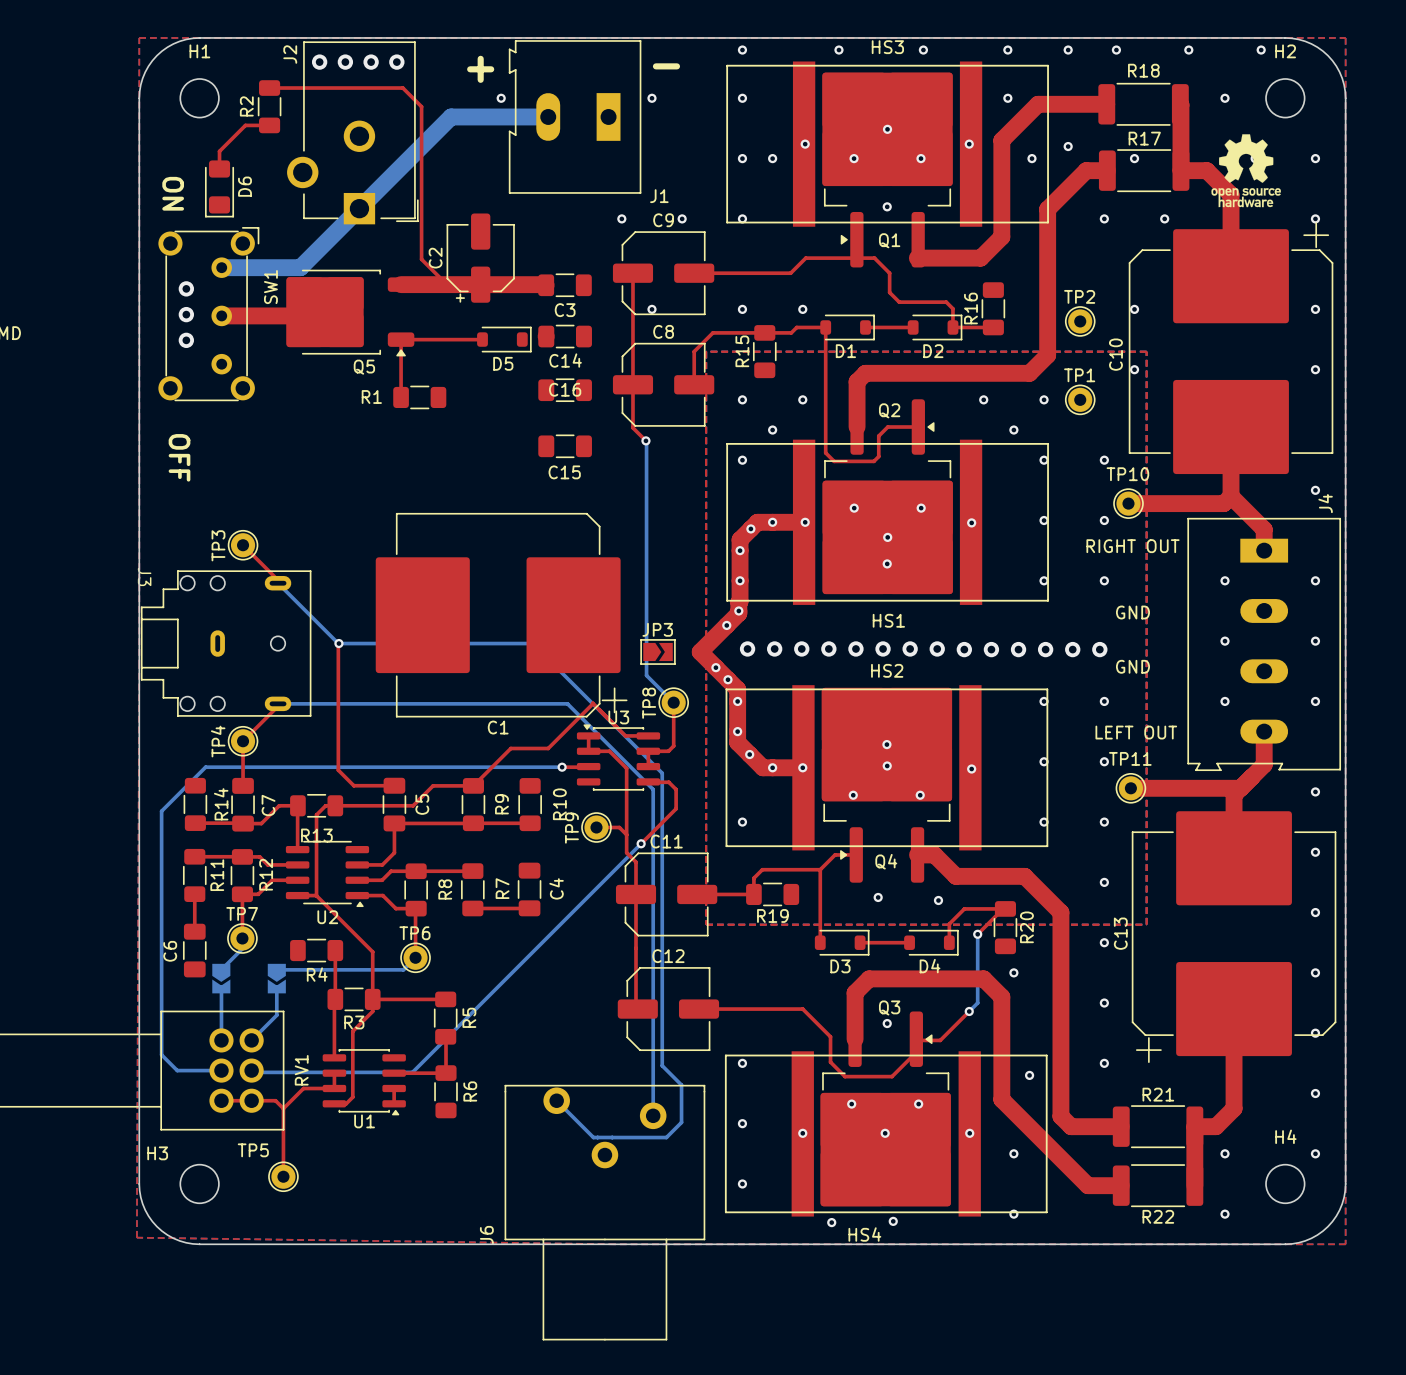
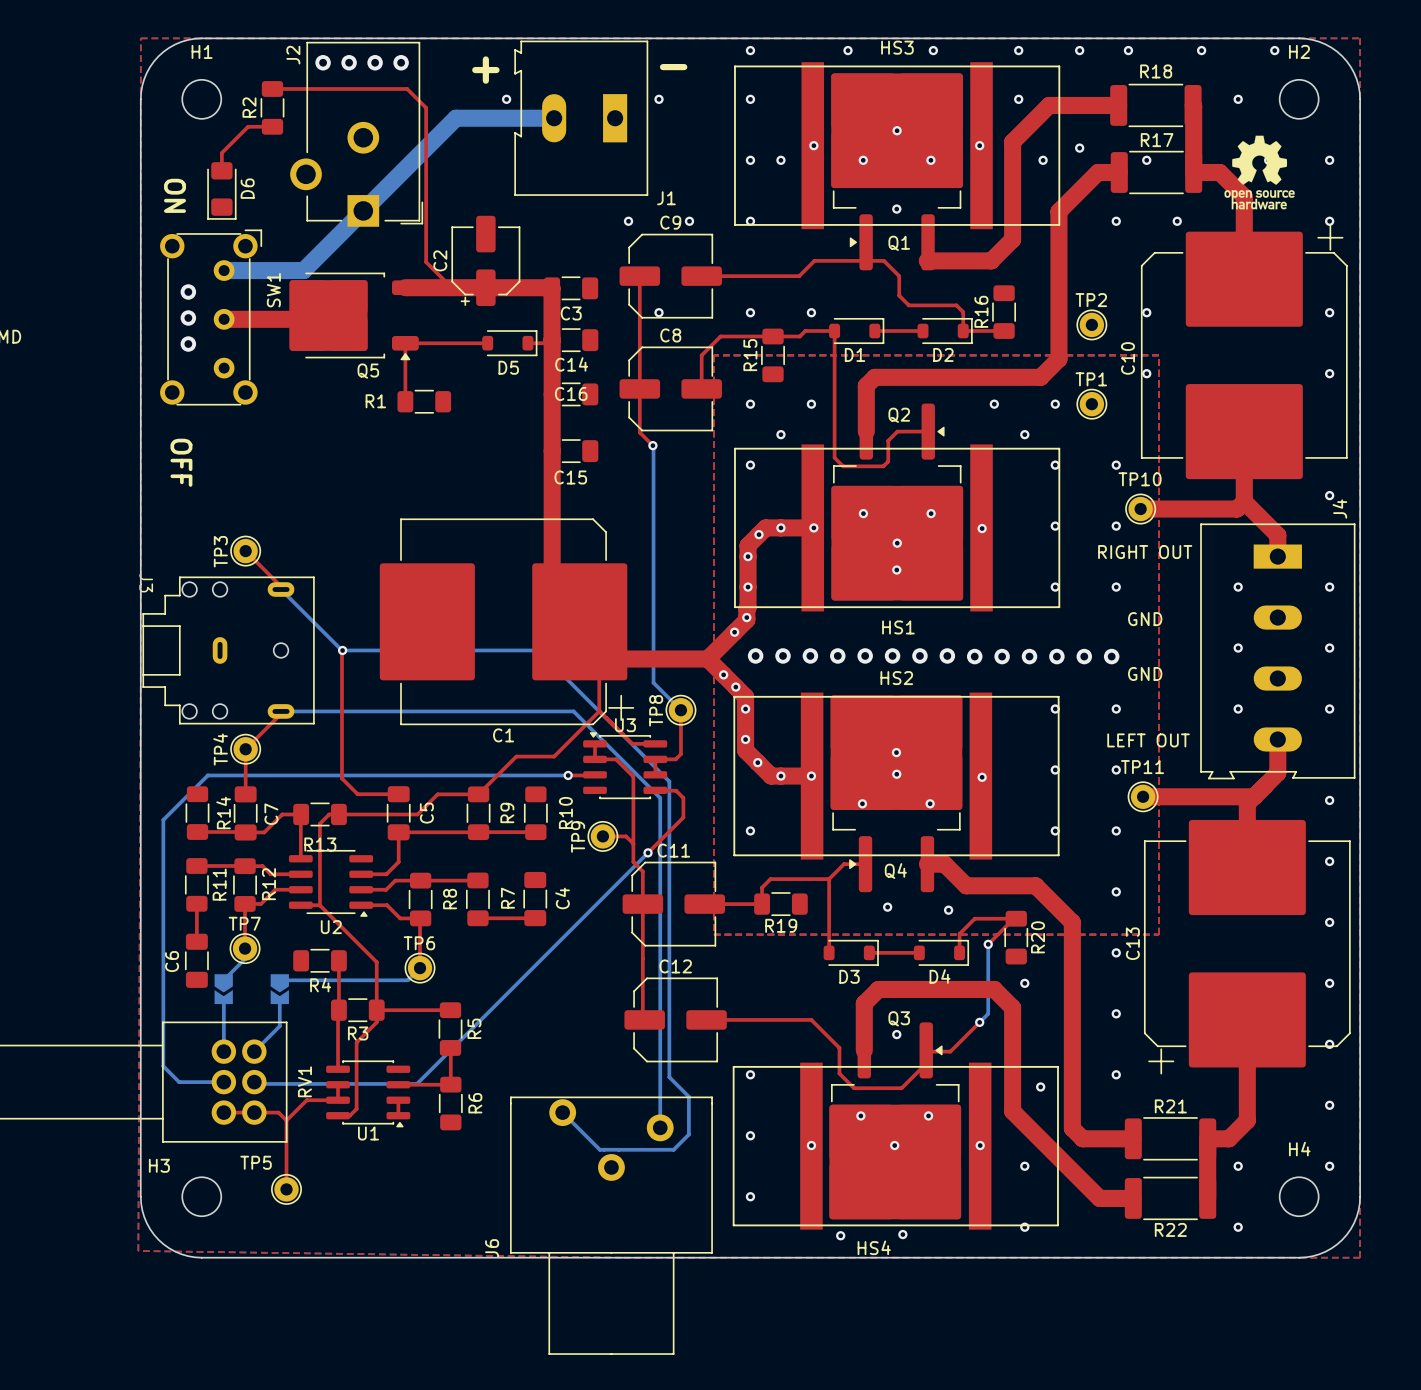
top track: none -> (552, 288) (552, 340)
top track: none -> (552, 340) (552, 594) (578, 621)
top track: none -> (527, 343) (549, 343)
JP3: (658, 651) -> none
top track: none -> (707, 659) (621, 659) (599, 636) (599, 710)

